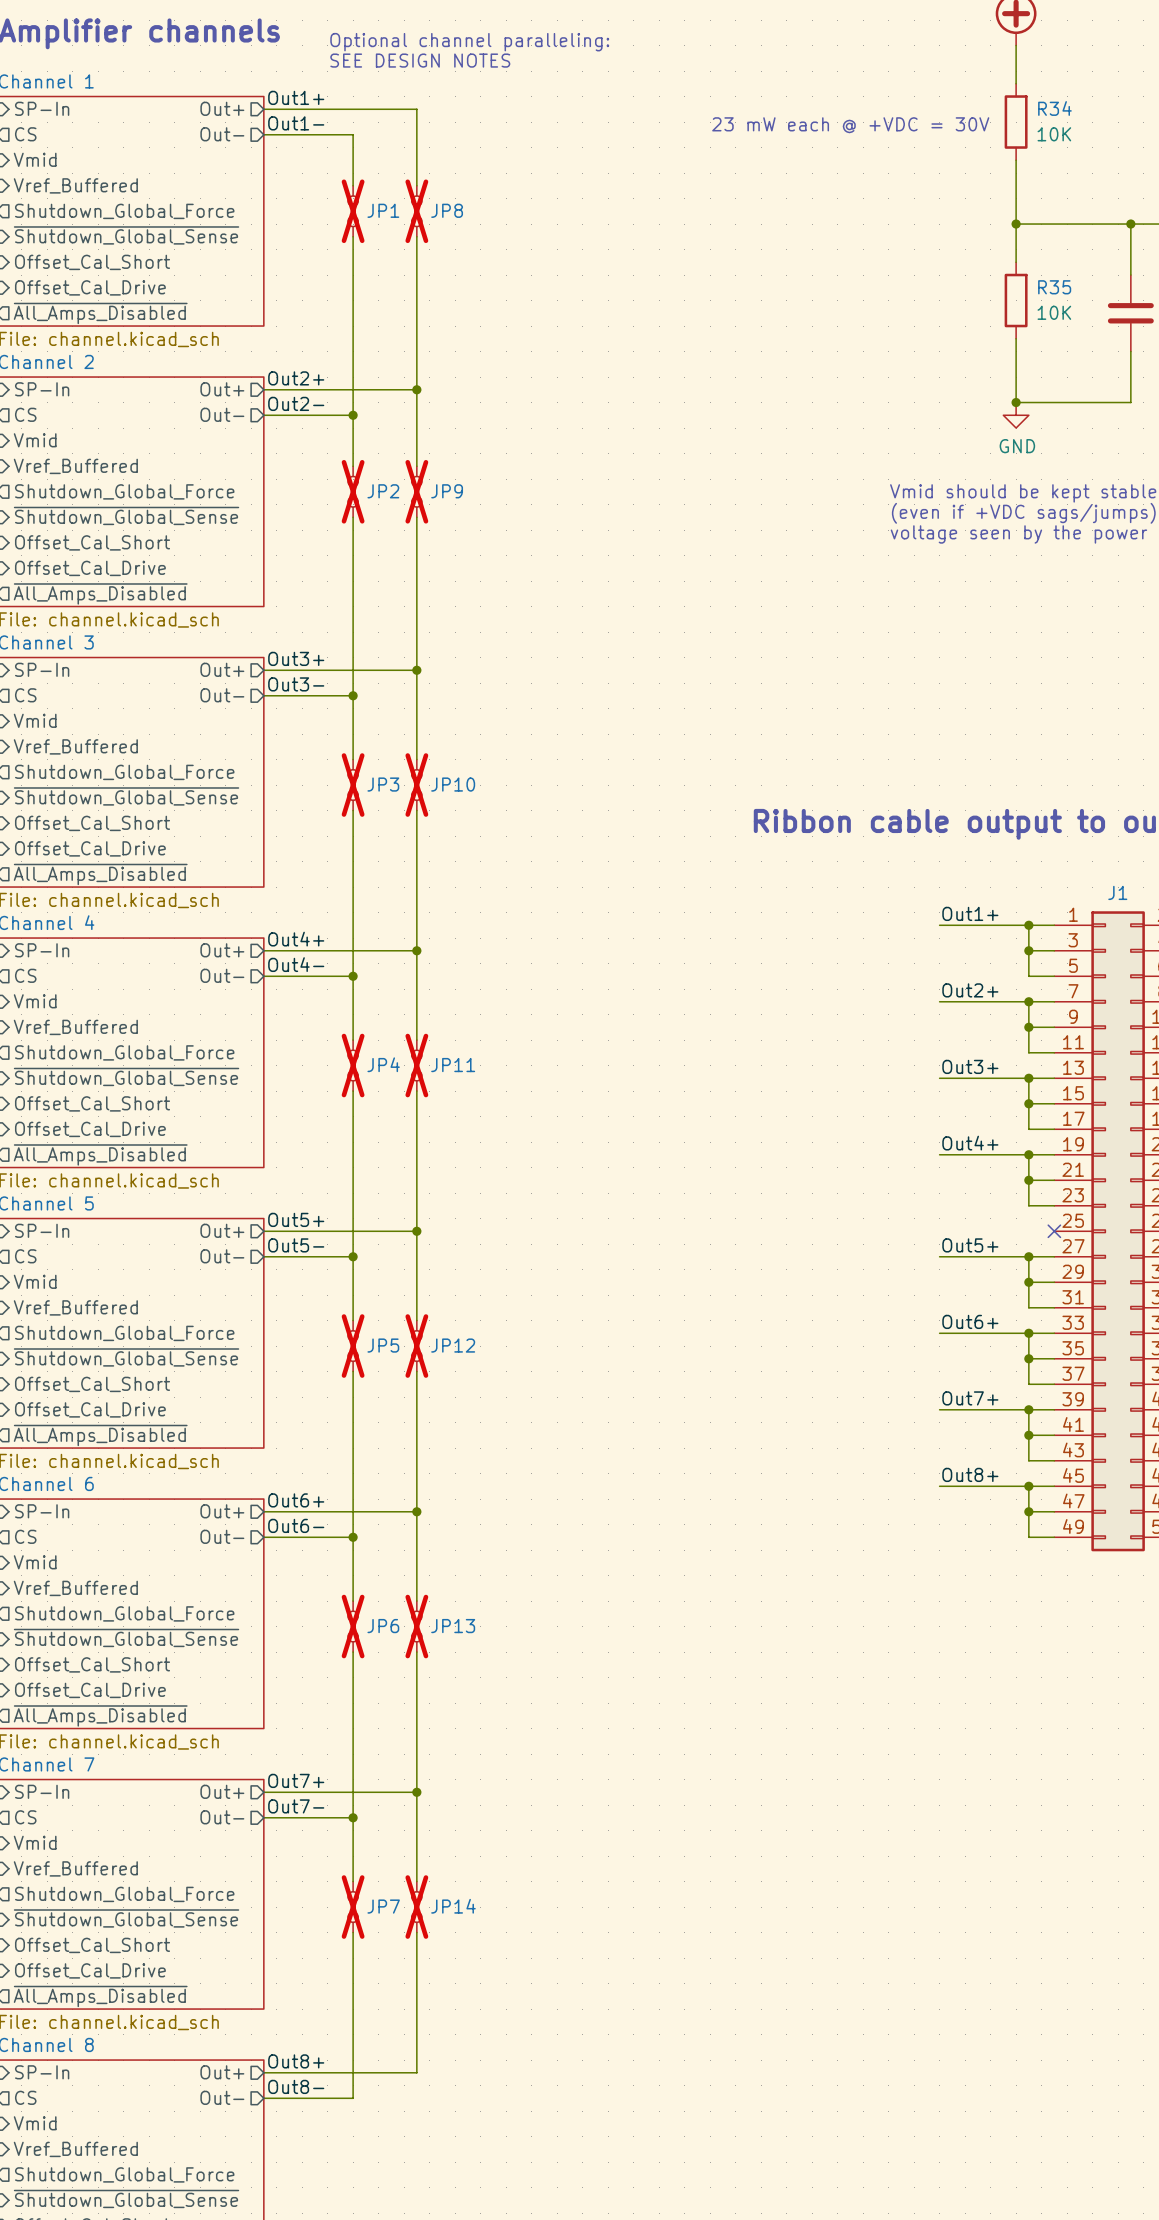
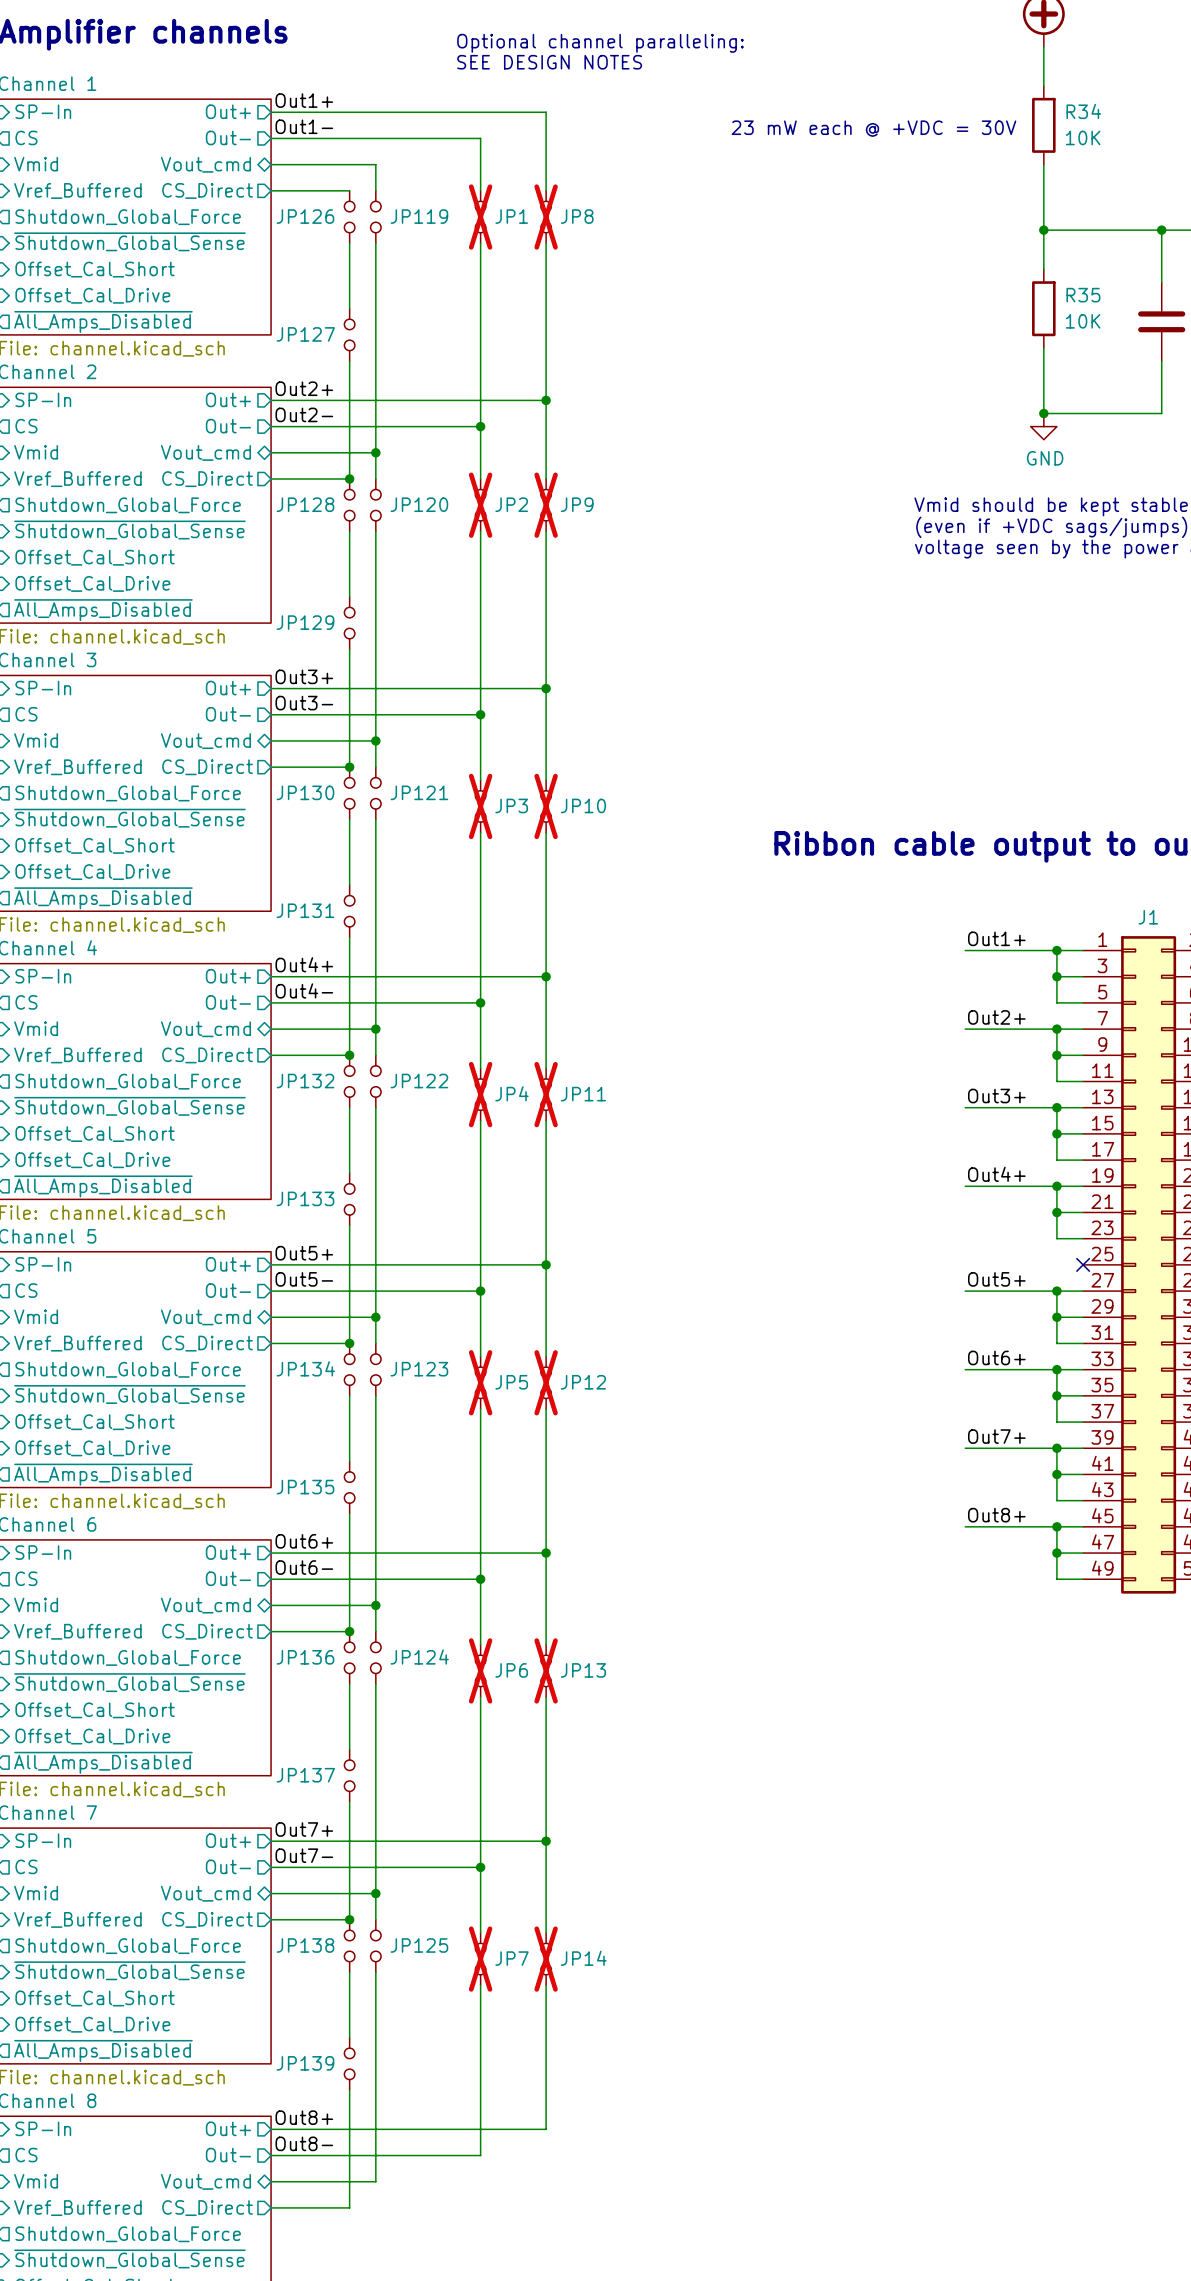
text position: Optional channel paralleling: (469, 42) -> Optional channel paralleling: (600, 43)
text position: SEE DESIGN NOTES (420, 60) -> SEE DESIGN NOTES (549, 62)
wire: (416, 109) (416, 185) -> (428, 112) (546, 112) (546, 190)
wire: (353, 134) (353, 185) -> (362, 138) (480, 138) (480, 190)
sheet pin: none -> Vout_cmd (205, 164)
wire: none -> (271, 164) (375, 164) (375, 190)
sheet pin: none -> CS_Direct (207, 190)
wire: none -> (271, 190) (349, 190)
JP126: none -> (349, 217)
JP1 position: (353, 211) -> (480, 217)
JP119: none -> (375, 217)
JP8 position: (416, 211) -> (546, 217)
wire: none -> (349, 243) (349, 308)
wire: (353, 236) (353, 466) -> (480, 243) (480, 479)
wire: none -> (375, 243) (375, 479)
wire: (416, 236) (416, 466) -> (546, 243) (546, 479)
JP127: none -> (349, 334)
wire: none -> (349, 361) (349, 479) (271, 479)
wire: none -> (428, 400) (546, 400)
junction: (416, 389) -> none
junction: none -> (546, 400)
wire: none -> (362, 426) (480, 426)
junction: (353, 415) -> none
junction: none -> (480, 426)
sheet pin: none -> Vout_cmd (205, 452)
wire: none -> (271, 452) (375, 452)
junction: none -> (375, 452)
sheet pin: none -> CS_Direct (207, 479)
junction: none -> (349, 479)
JP128: none -> (349, 505)
JP2 position: (353, 491) -> (480, 505)
JP120: none -> (375, 505)
JP9 position: (416, 491) -> (546, 505)
wire: none -> (349, 531) (349, 596)
wire: (353, 517) (353, 759) -> (480, 531) (480, 780)
wire: none -> (375, 531) (375, 767)
wire: (416, 517) (416, 759) -> (546, 531) (546, 780)
JP129: none -> (349, 623)
wire: none -> (349, 649) (349, 767) (271, 767)
wire: none -> (428, 688) (546, 688)
junction: (416, 670) -> none
junction: none -> (546, 688)
wire: none -> (362, 714) (480, 714)
junction: (353, 695) -> none
junction: none -> (480, 714)
sheet pin: none -> Vout_cmd (205, 741)
wire: none -> (271, 740) (375, 740)
junction: none -> (375, 740)
sheet pin: none -> CS_Direct (207, 767)
junction: none -> (349, 767)
JP130: none -> (349, 793)
JP121: none -> (375, 793)
JP3 position: (353, 785) -> (480, 806)
JP10 position: (416, 785) -> (546, 806)
wire: none -> (349, 819) (349, 885)
wire: none -> (375, 819) (375, 1055)
wire: (353, 810) (353, 1040) -> (480, 832) (480, 1068)
wire: (416, 810) (416, 1040) -> (546, 832) (546, 1068)
JP131: none -> (349, 911)
wire: none -> (349, 937) (349, 1055) (271, 1055)
wire: none -> (428, 976) (546, 976)
junction: (416, 950) -> none
junction: none -> (546, 976)
wire: none -> (362, 1002) (480, 1002)
junction: (353, 976) -> none
junction: none -> (480, 1002)
sheet pin: none -> Vout_cmd (205, 1029)
wire: none -> (271, 1029) (375, 1029)
junction: none -> (375, 1029)
sheet pin: none -> CS_Direct (207, 1055)
junction: none -> (349, 1055)
JP132: none -> (349, 1081)
JP122: none -> (375, 1081)
JP4 position: (353, 1065) -> (480, 1094)
JP11 position: (416, 1065) -> (546, 1094)
wire: none -> (349, 1107) (349, 1173)
wire: none -> (375, 1107) (375, 1343)
wire: (353, 1091) (353, 1320) -> (480, 1120) (480, 1356)
wire: (416, 1091) (416, 1320) -> (546, 1120) (546, 1356)
JP133: none -> (349, 1199)
wire: none -> (349, 1225) (349, 1343) (271, 1343)
wire: none -> (428, 1264) (546, 1264)
junction: (416, 1231) -> none
junction: none -> (546, 1264)
wire: none -> (362, 1291) (480, 1291)
junction: (353, 1256) -> none
junction: none -> (480, 1291)
sheet pin: none -> Vout_cmd (205, 1317)
wire: none -> (271, 1317) (375, 1317)
junction: none -> (375, 1317)
sheet pin: none -> CS_Direct (207, 1343)
junction: none -> (349, 1343)
JP134: none -> (349, 1369)
JP123: none -> (375, 1369)
JP5 position: (353, 1346) -> (480, 1382)
JP12 position: (416, 1346) -> (546, 1382)
wire: none -> (349, 1395) (349, 1461)
wire: none -> (375, 1395) (375, 1631)
wire: (353, 1371) (353, 1601) -> (480, 1408) (480, 1644)
wire: (416, 1371) (416, 1601) -> (546, 1408) (546, 1644)
JP135: none -> (349, 1487)
wire: none -> (349, 1513) (349, 1631) (271, 1631)
wire: none -> (428, 1553) (546, 1553)
junction: (416, 1511) -> none
junction: none -> (546, 1553)
wire: none -> (362, 1579) (480, 1579)
junction: (353, 1537) -> none
junction: none -> (480, 1579)
sheet pin: none -> Vout_cmd (205, 1605)
wire: none -> (271, 1605) (375, 1605)
junction: none -> (375, 1605)
sheet pin: none -> CS_Direct (207, 1631)
junction: none -> (349, 1631)
JP136: none -> (349, 1657)
JP124: none -> (375, 1657)
JP6 position: (353, 1626) -> (480, 1670)
JP13 position: (416, 1626) -> (546, 1670)
wire: none -> (349, 1684) (349, 1749)
wire: none -> (375, 1684) (375, 1919)
wire: (353, 1652) (353, 1881) -> (480, 1697) (480, 1932)
wire: (416, 1652) (416, 1881) -> (546, 1697) (546, 1932)
JP137: none -> (349, 1775)
wire: none -> (349, 1801) (349, 1919) (271, 1919)
wire: none -> (428, 1841) (546, 1841)
junction: (416, 1792) -> none
junction: none -> (546, 1841)
wire: none -> (362, 1867) (480, 1867)
junction: (353, 1817) -> none
junction: none -> (480, 1867)
sheet pin: none -> Vout_cmd (205, 1893)
wire: none -> (271, 1893) (375, 1893)
junction: none -> (375, 1893)
sheet pin: none -> CS_Direct (207, 1919)
junction: none -> (349, 1919)
JP138: none -> (349, 1945)
JP125: none -> (375, 1945)
JP7 position: (353, 1907) -> (480, 1959)
JP14 position: (416, 1907) -> (546, 1959)
wire: none -> (349, 1972) (349, 2037)
wire: none -> (375, 1972) (375, 2181) (271, 2181)
wire: (353, 1932) (353, 2098) -> (480, 1985) (480, 2155) (362, 2155)
wire: (416, 1932) (416, 2072) -> (546, 1985) (546, 2129) (428, 2129)
JP139: none -> (349, 2063)
wire: none -> (349, 2090) (349, 2207) (271, 2207)
sheet pin: none -> Vout_cmd (205, 2181)
sheet pin: none -> CS_Direct (207, 2208)

